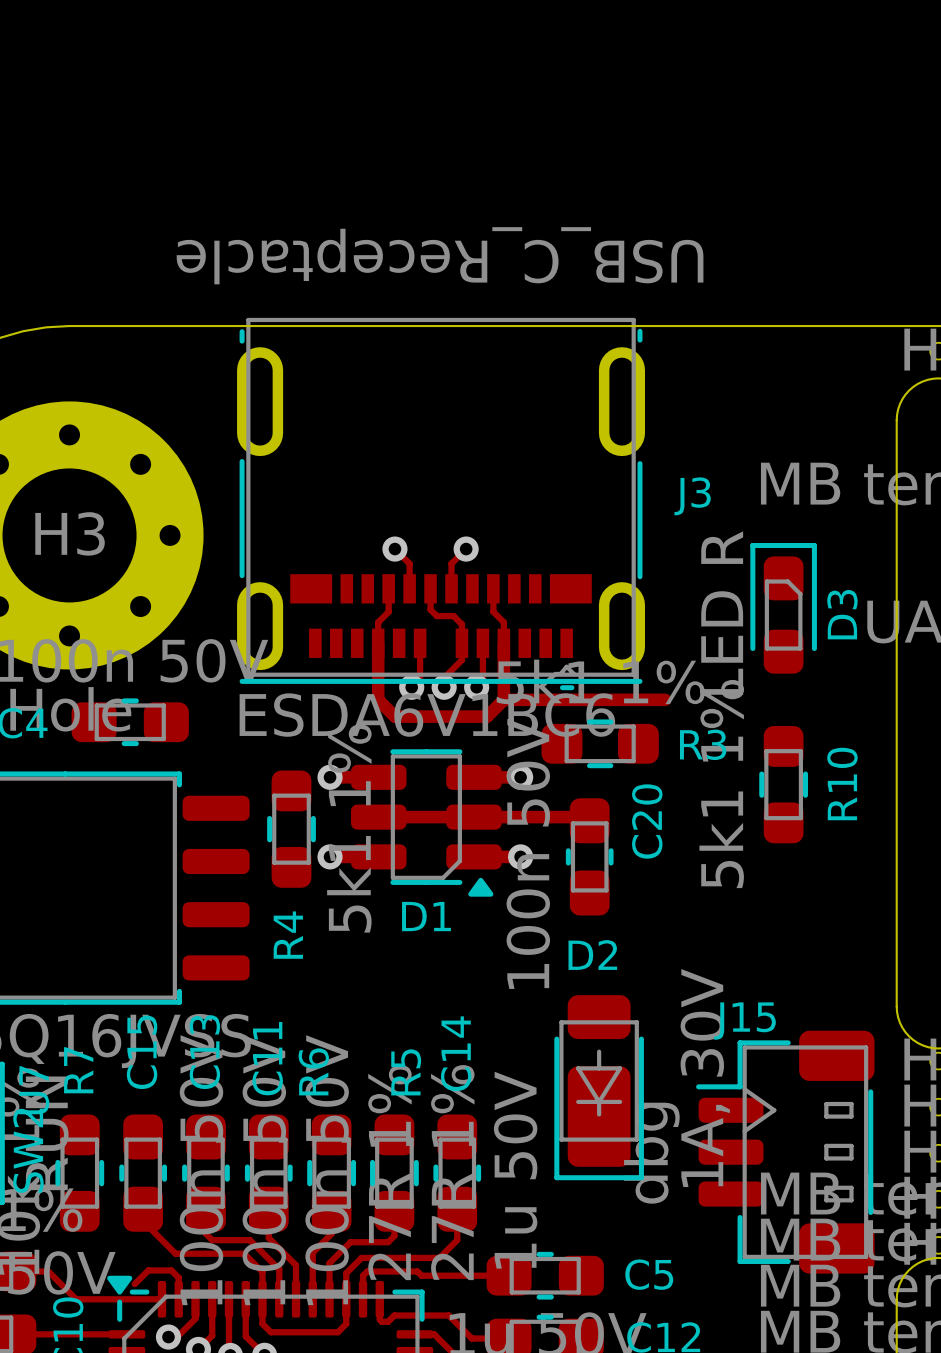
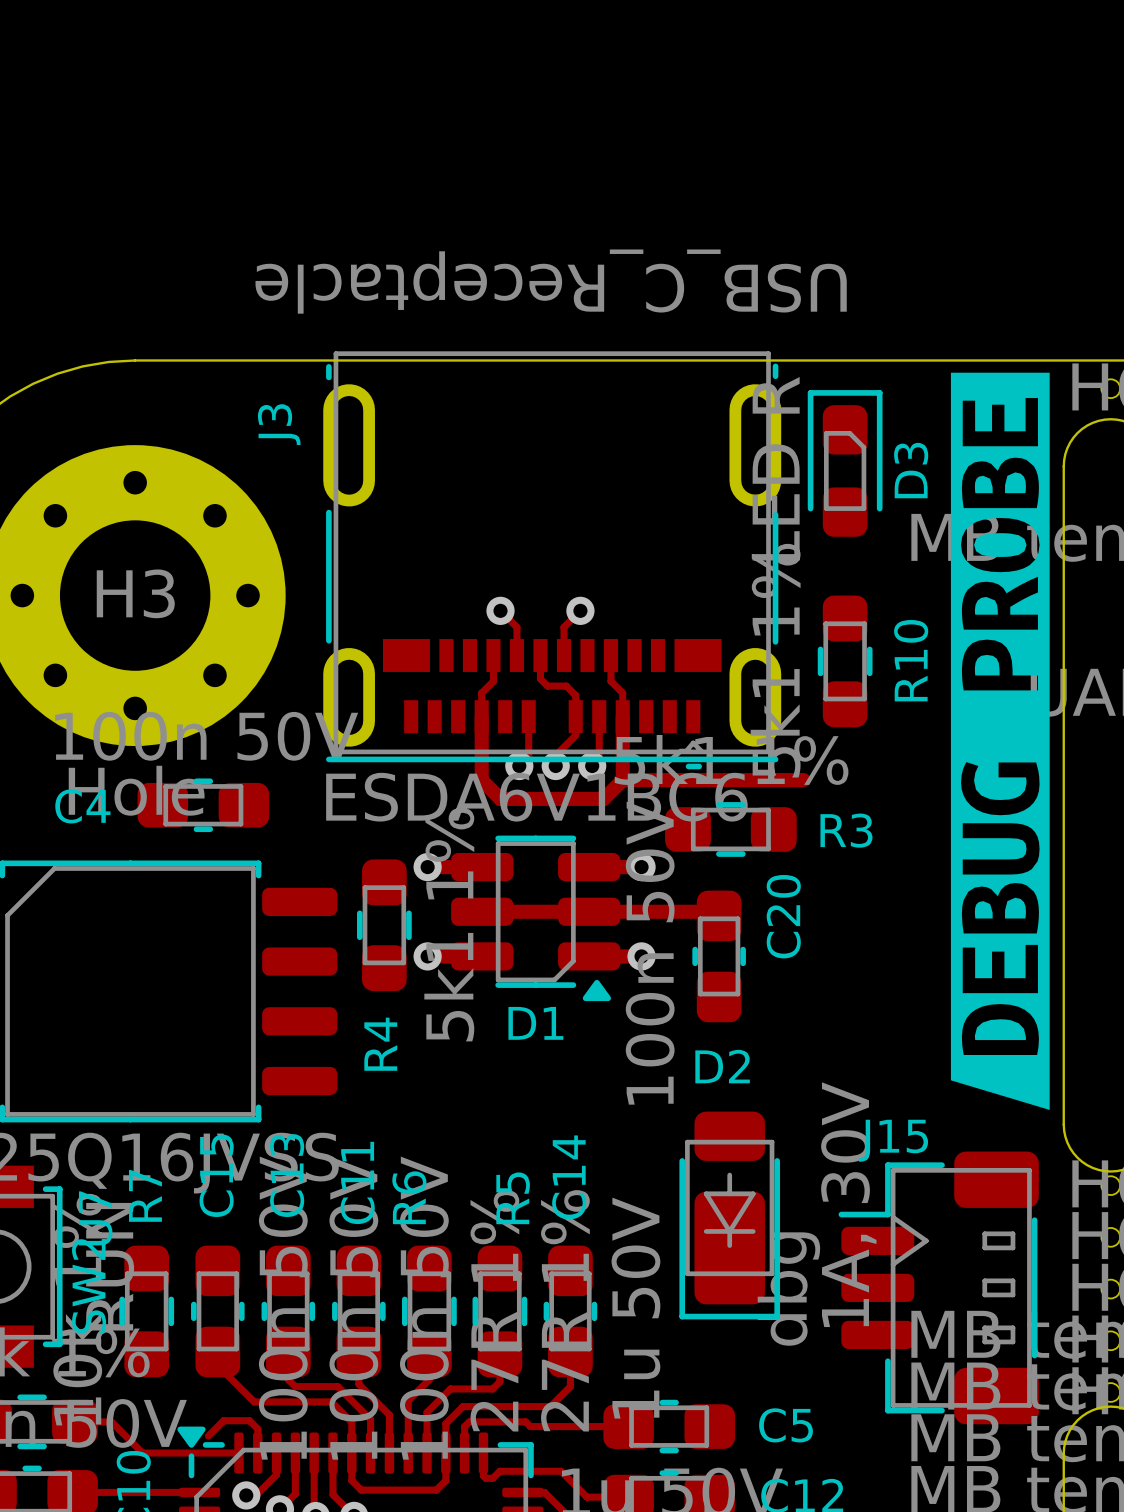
drawing: none -> [950, 372, 1050, 1110]
J3 name rotation: 0° (692, 496) -> 90° counterclockwise (279, 424)
J3 name position: J3 (692, 496) -> J3 (279, 424)
D3 position: (783, 608) -> (845, 463)
R10 position: (783, 784) -> (845, 661)

